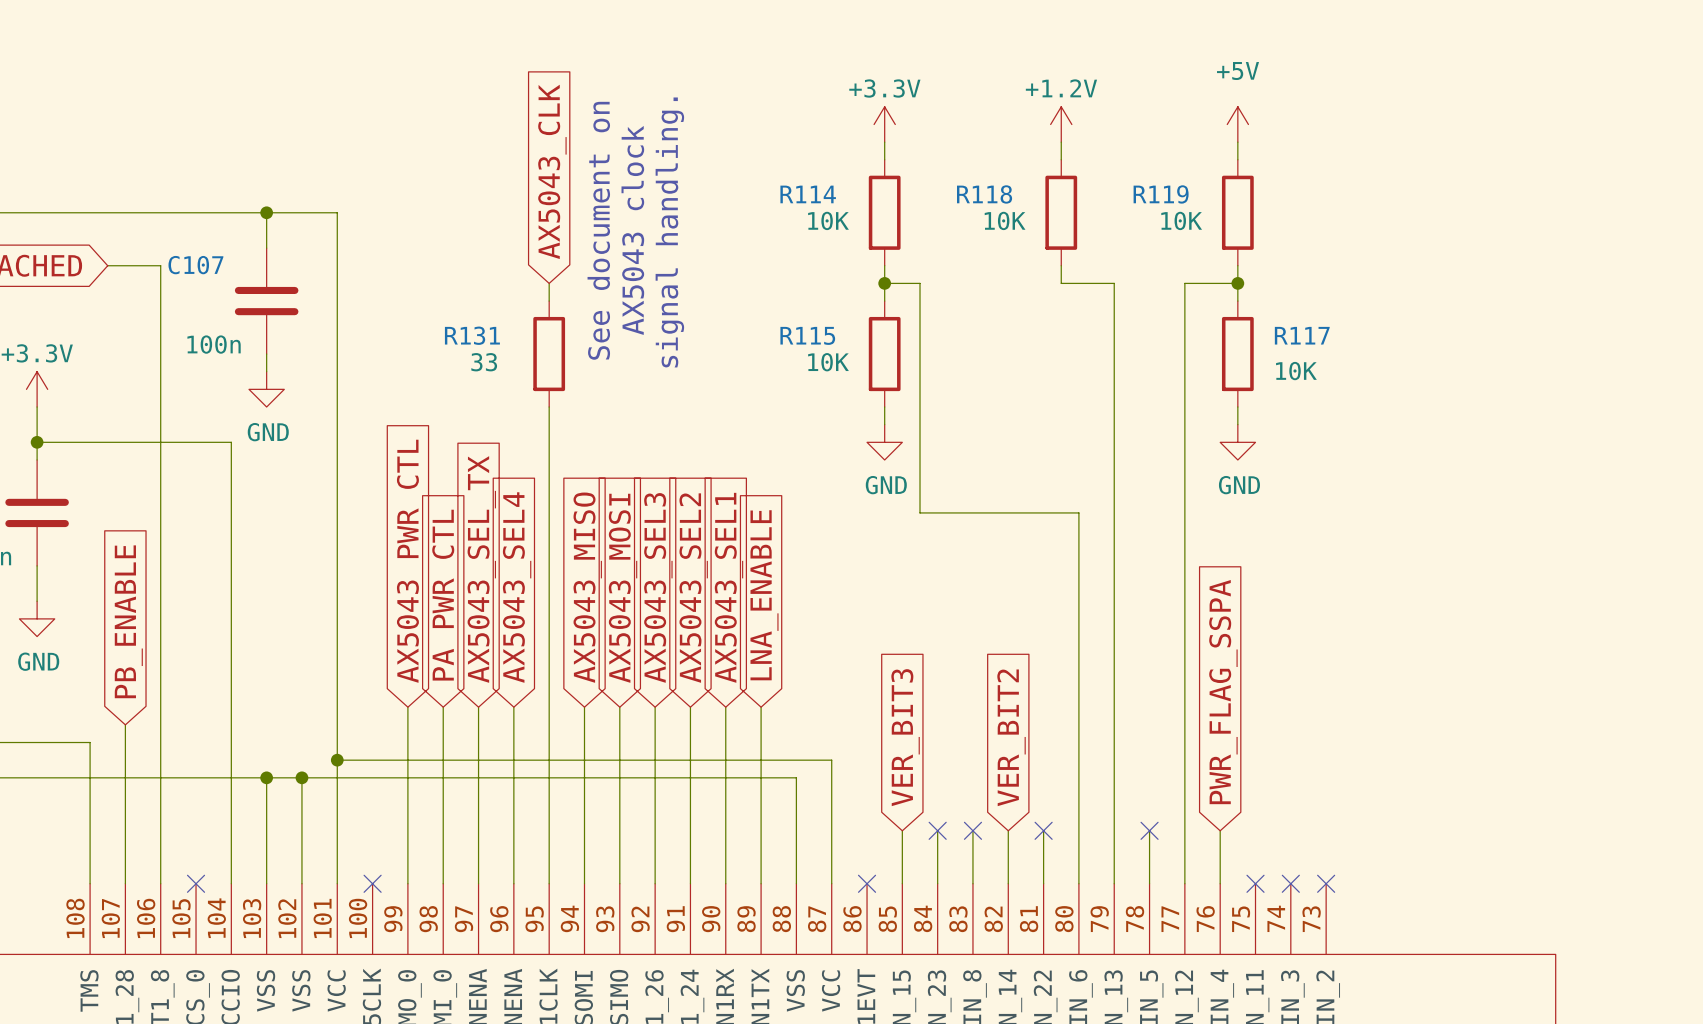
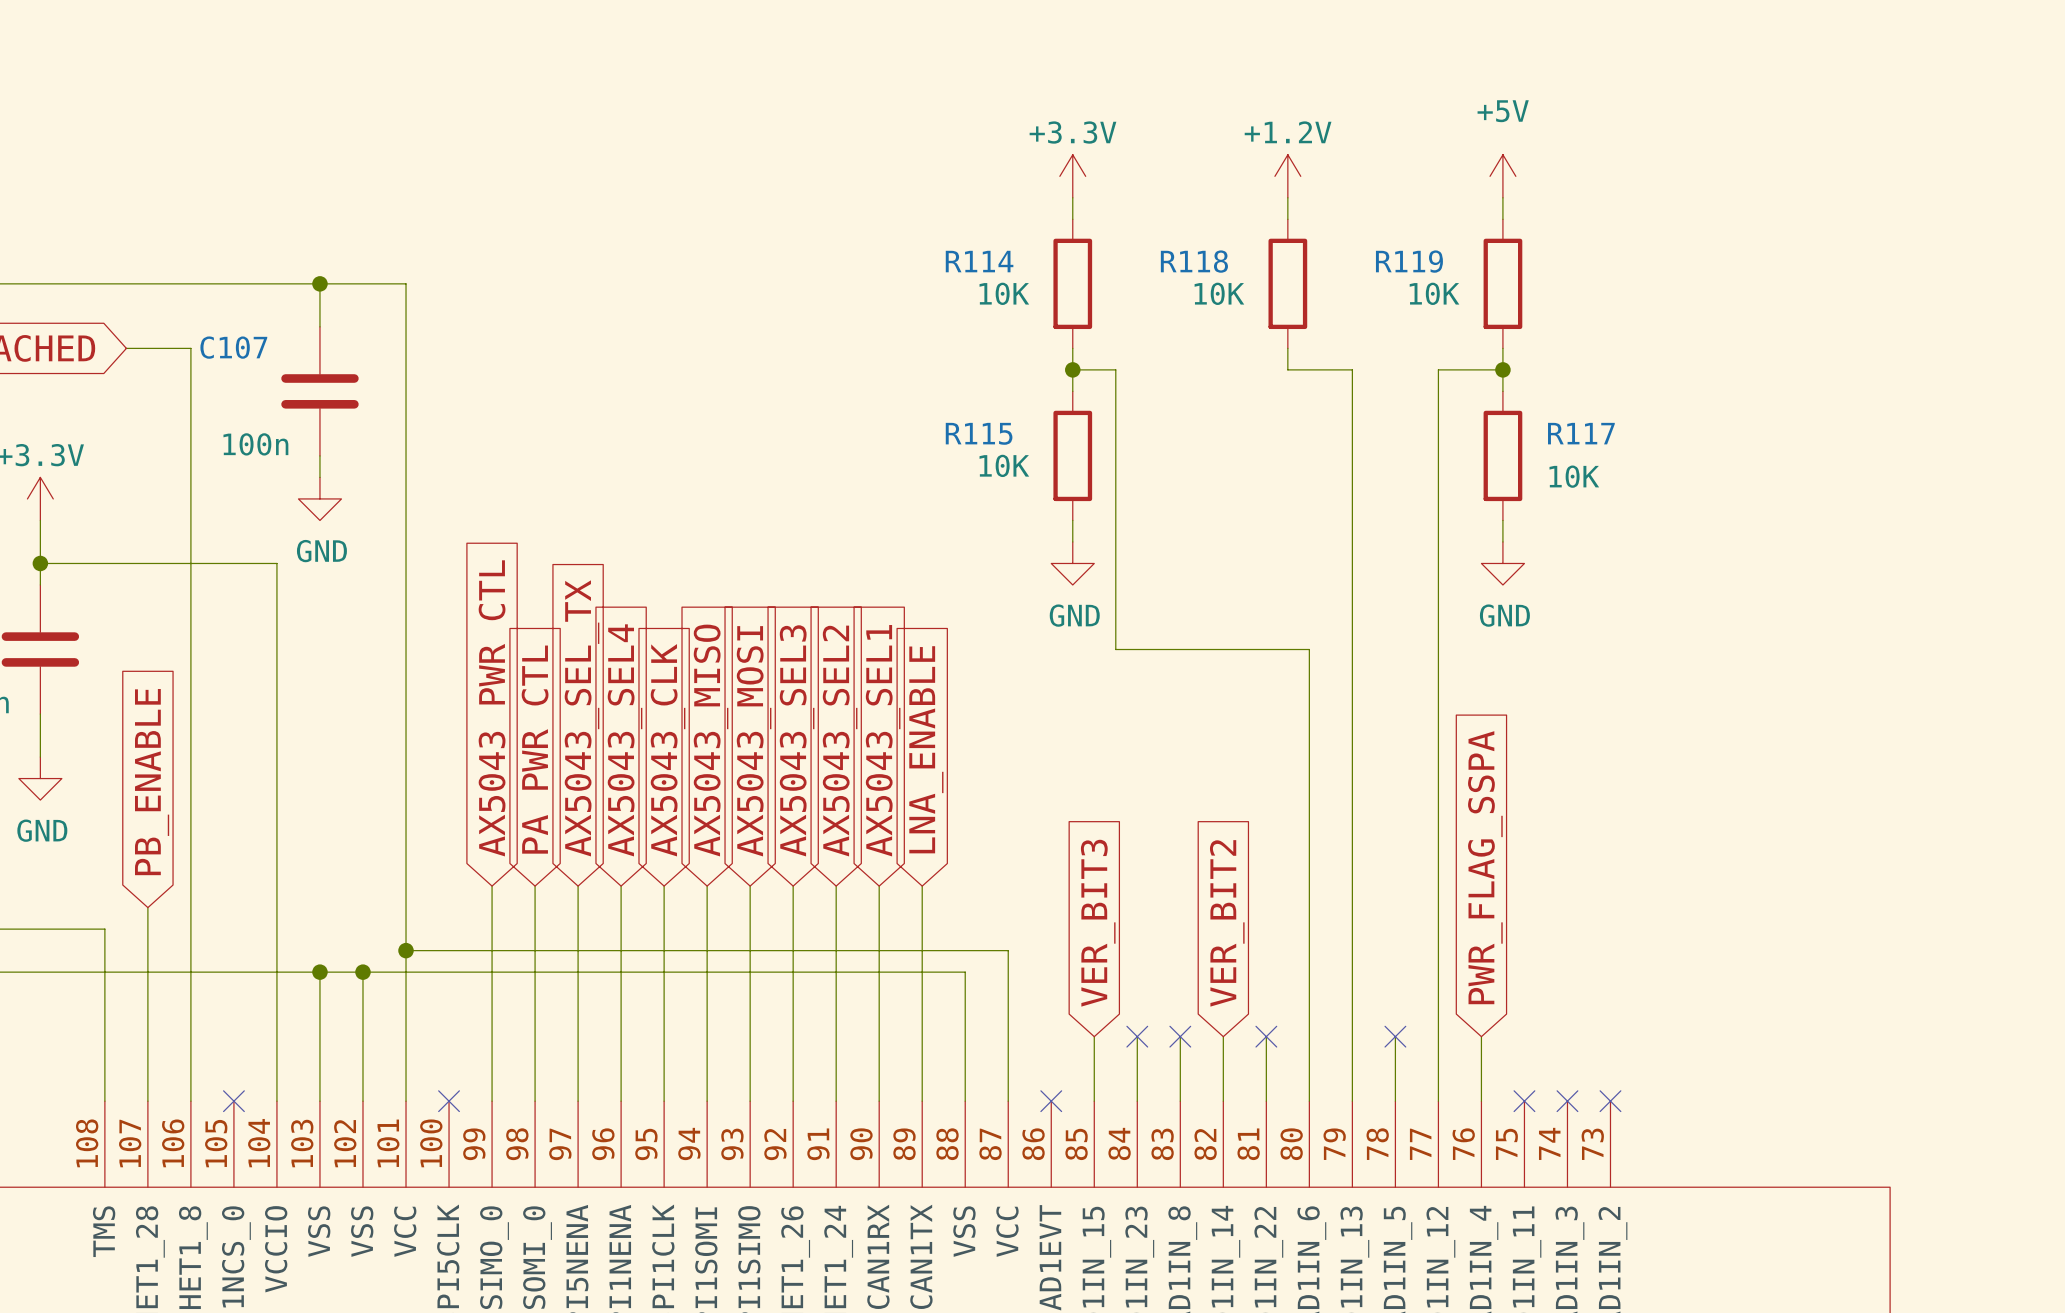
global label: AX5043_CLK (552, 171) -> none
text: See document on (598, 230) -> none
text: AX5043 clock (632, 230) -> none
text: signal handling. (669, 232) -> none
wire: (549, 283) (549, 301) -> none
R131: 33 (549, 354) -> none
wire: (549, 407) (549, 707) -> none
global label: none -> AX5043_CLK (668, 750)

